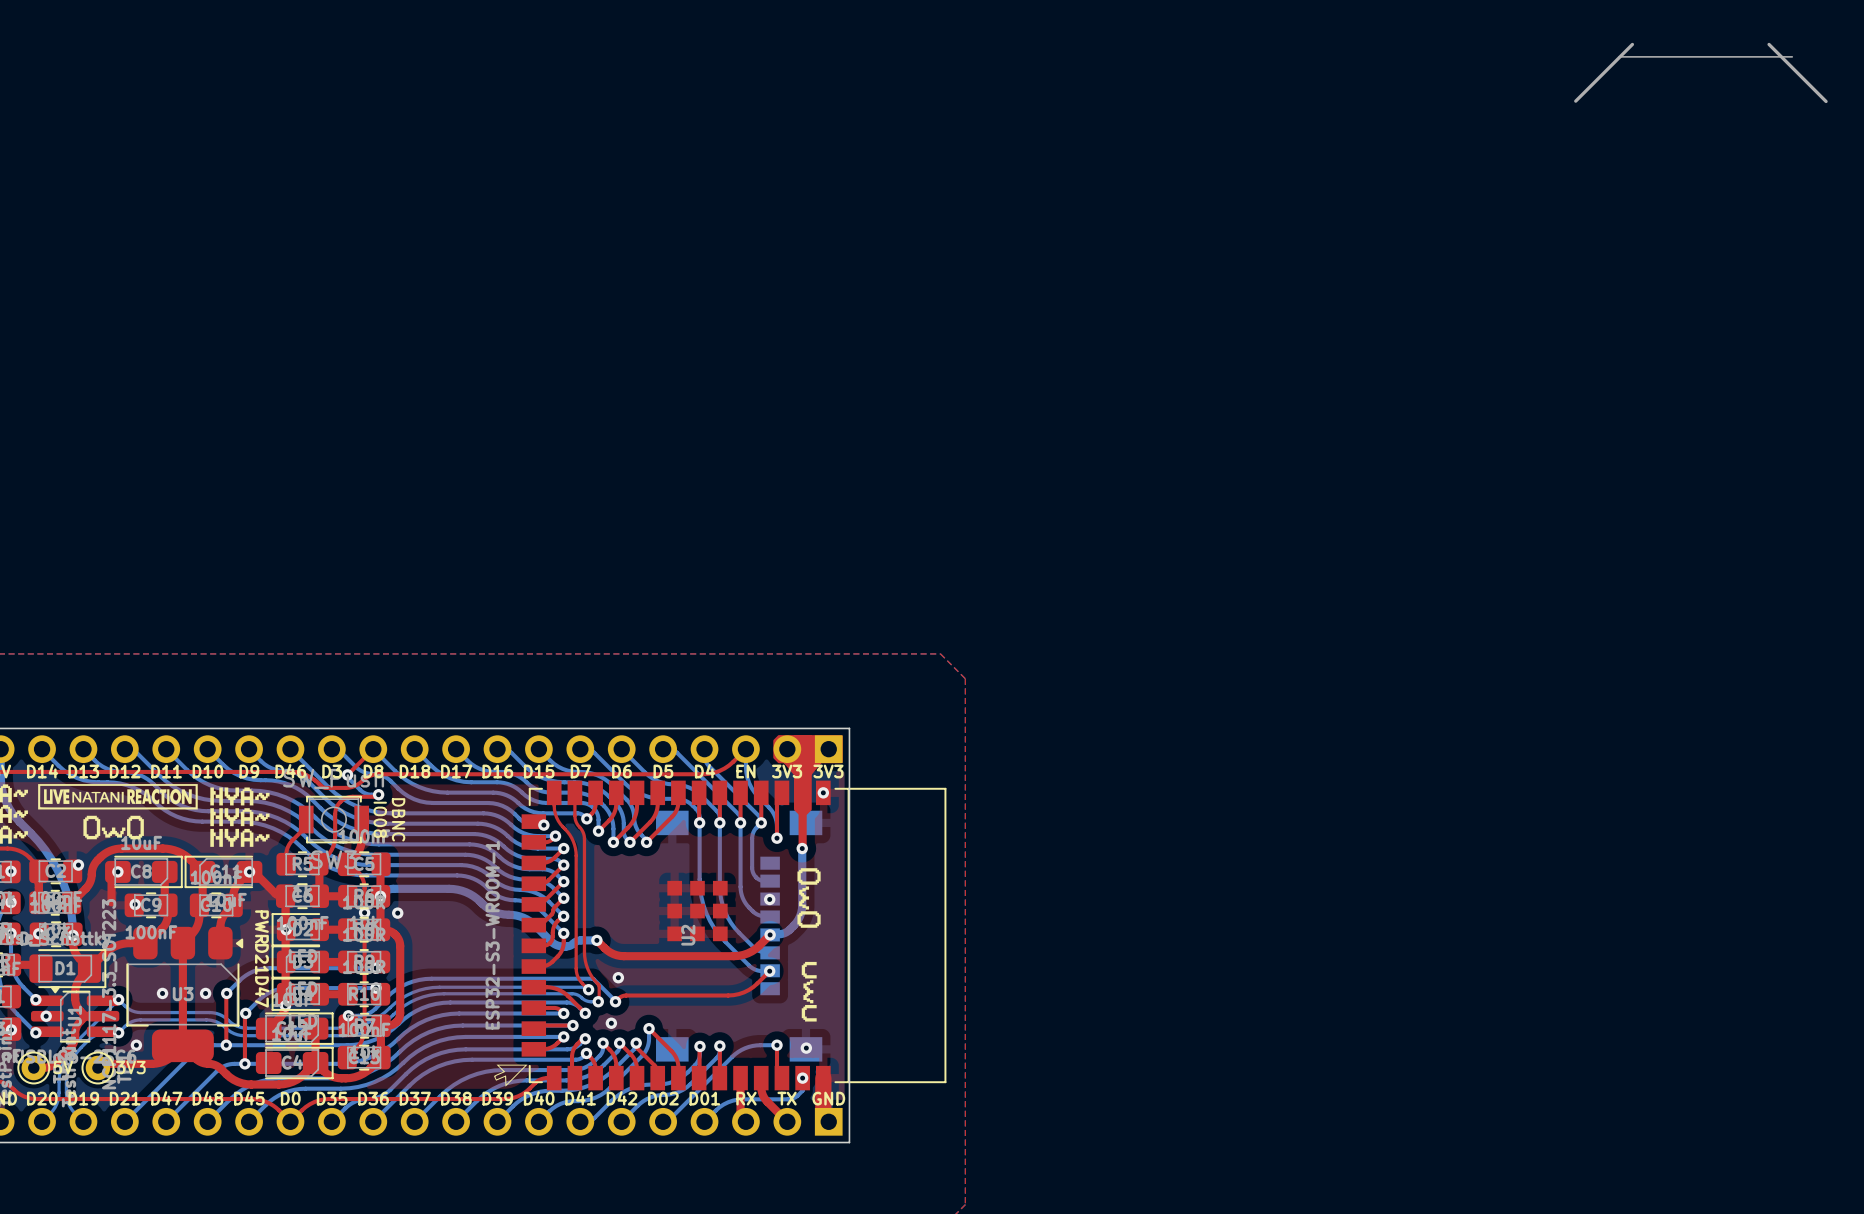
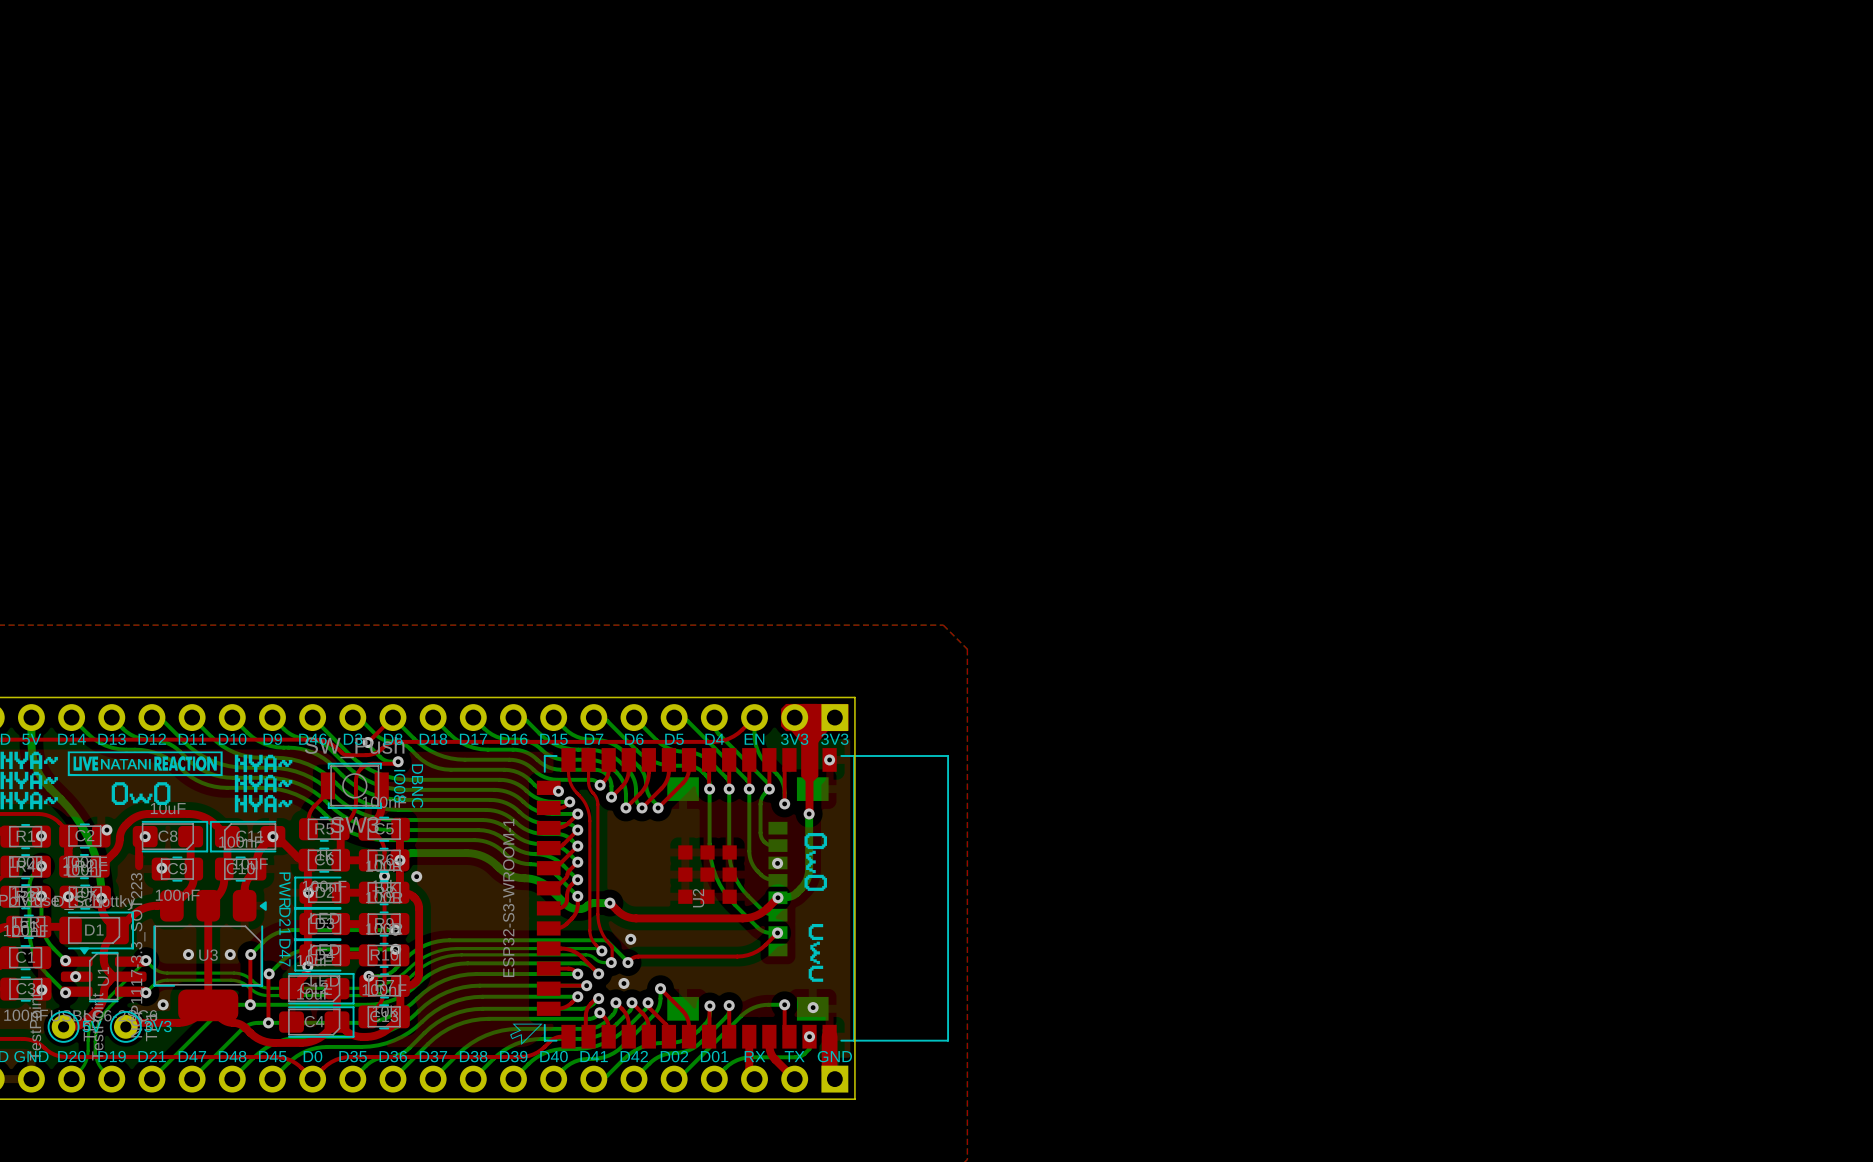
line: (1632, 44) (1575, 101) -> none
line: (1769, 44) (1826, 101) -> none
line: (1619, 56) (1792, 56) -> none

